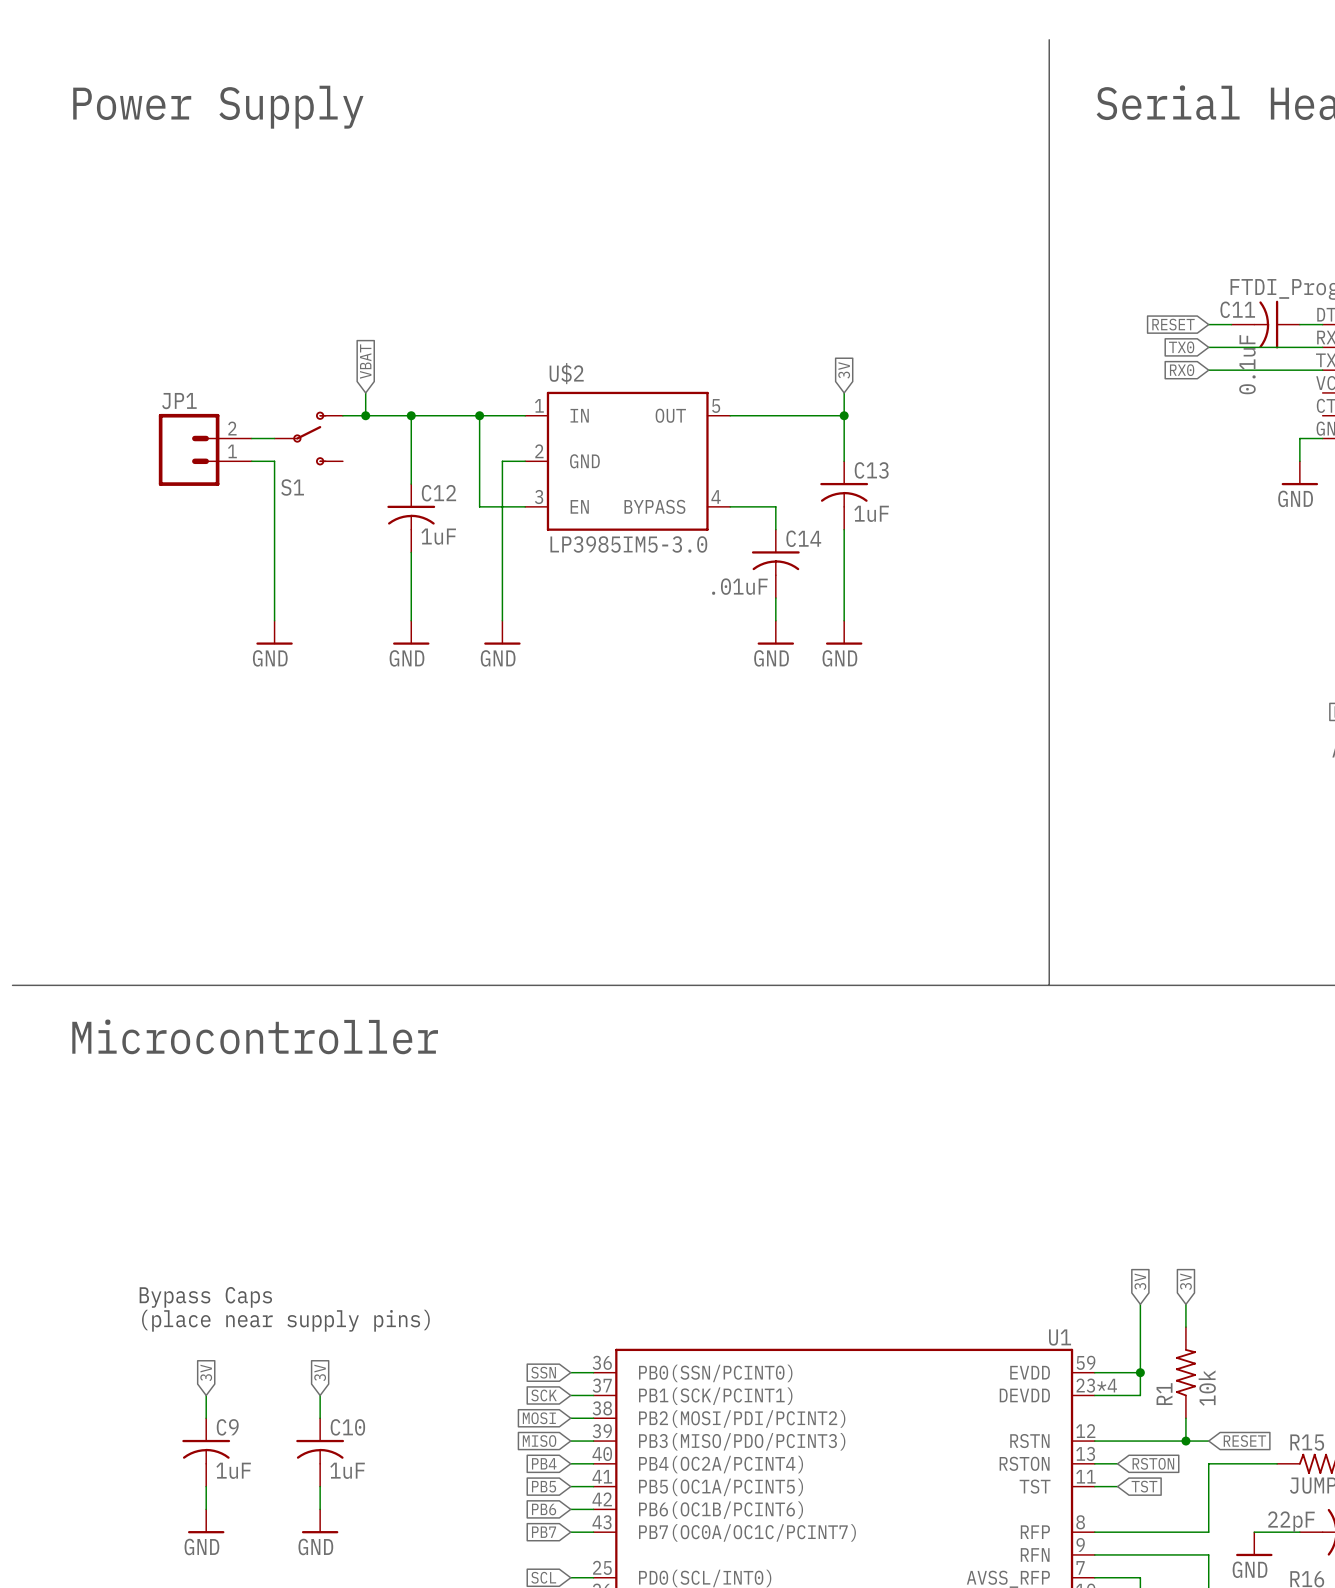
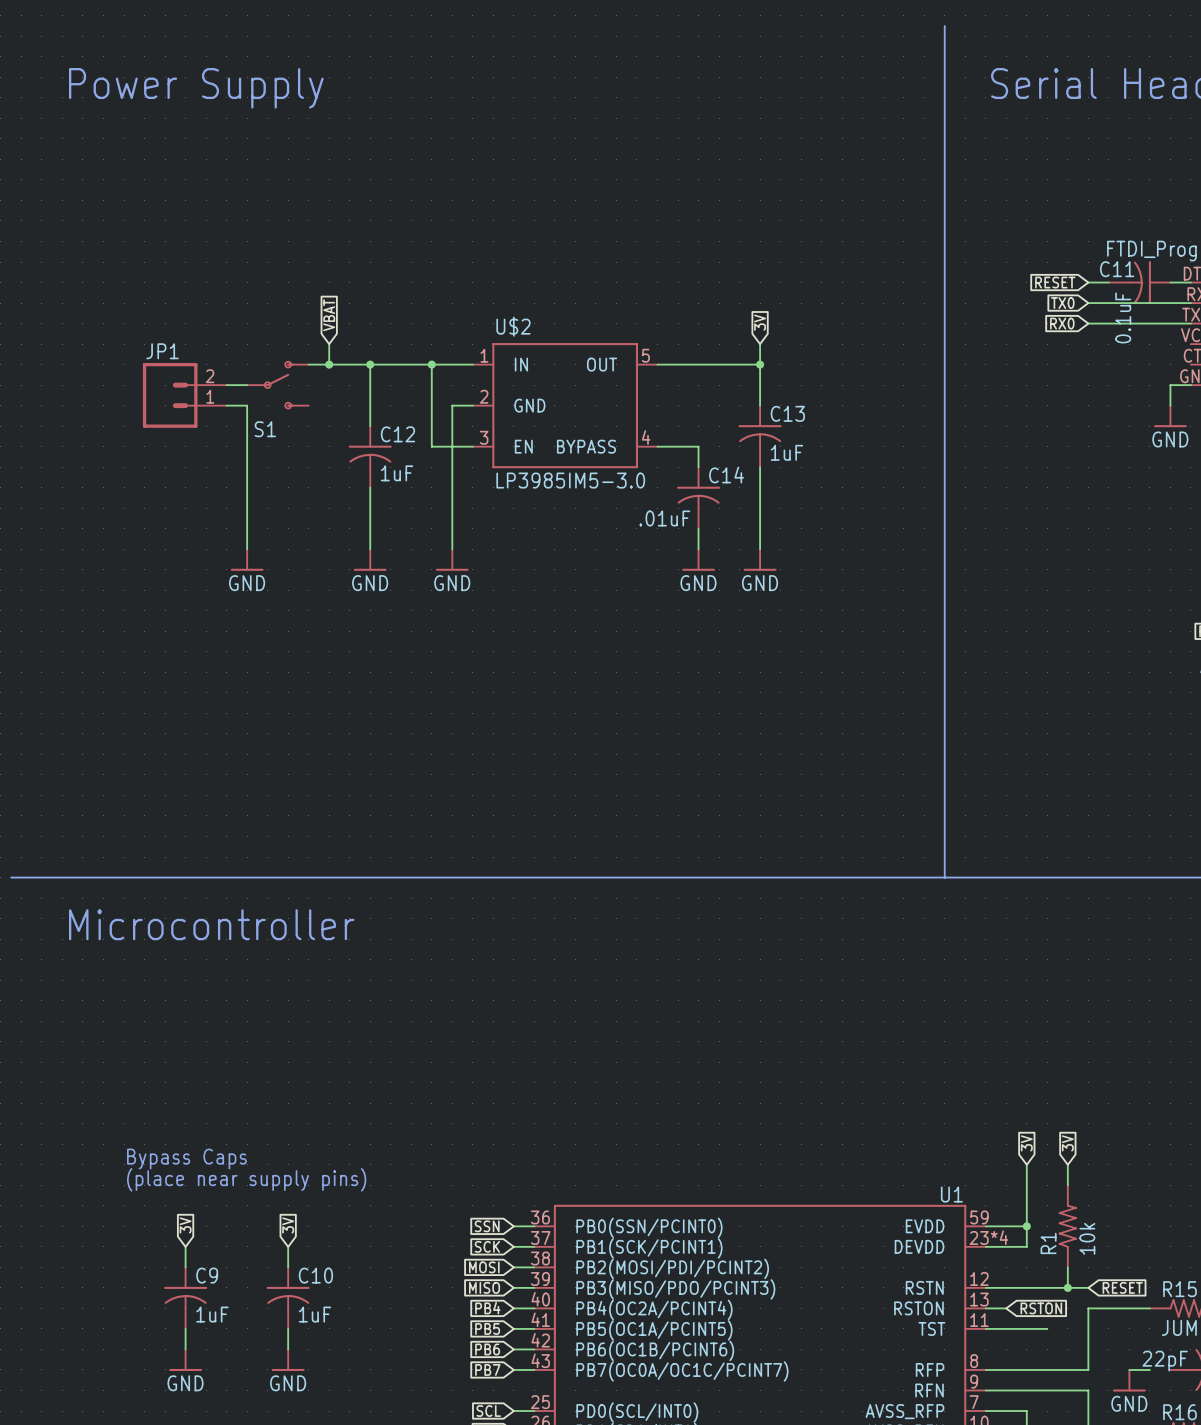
wire: none -> (1006, 1328) (1047, 1328)
global label: TST (1144, 1486) -> none
wire: (1277, 1532) (1299, 1532) -> none

